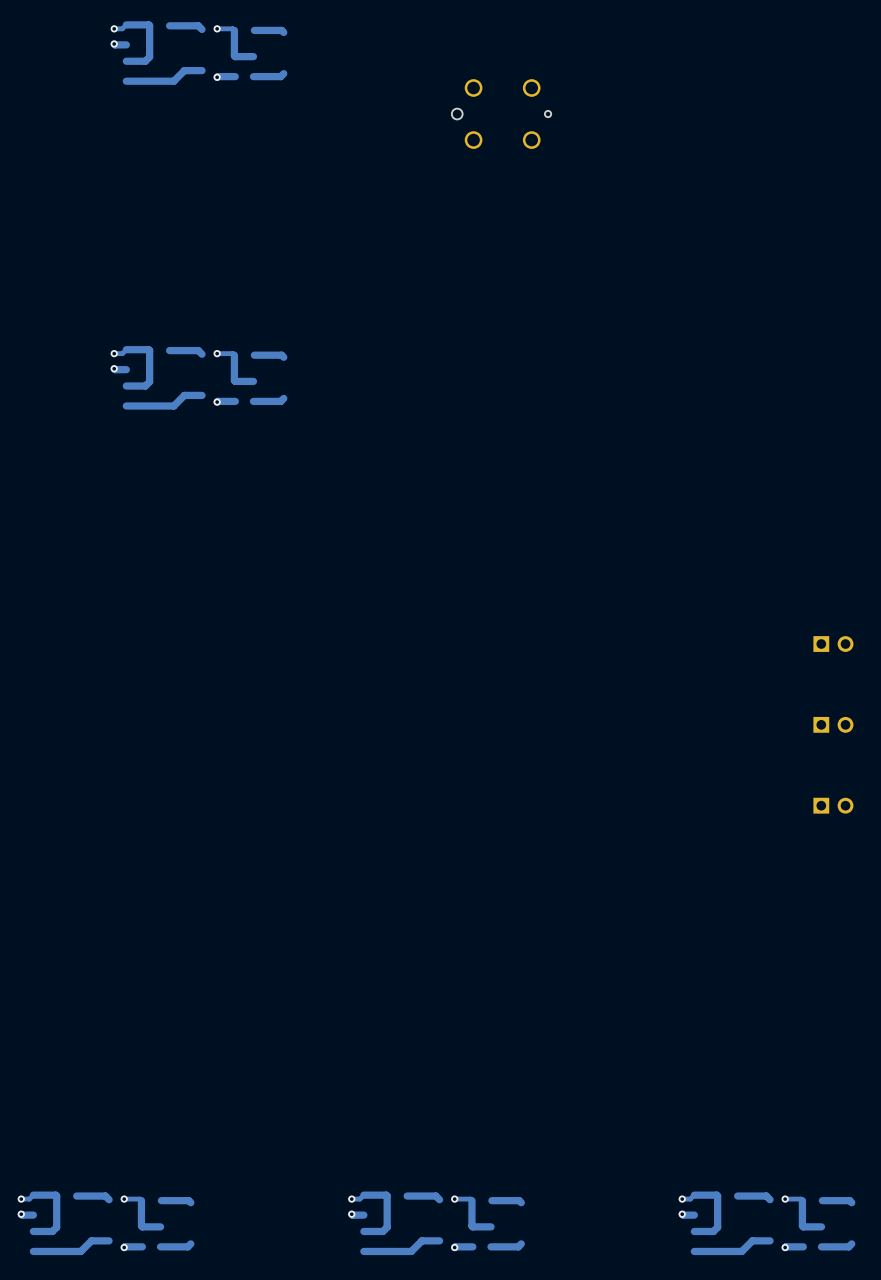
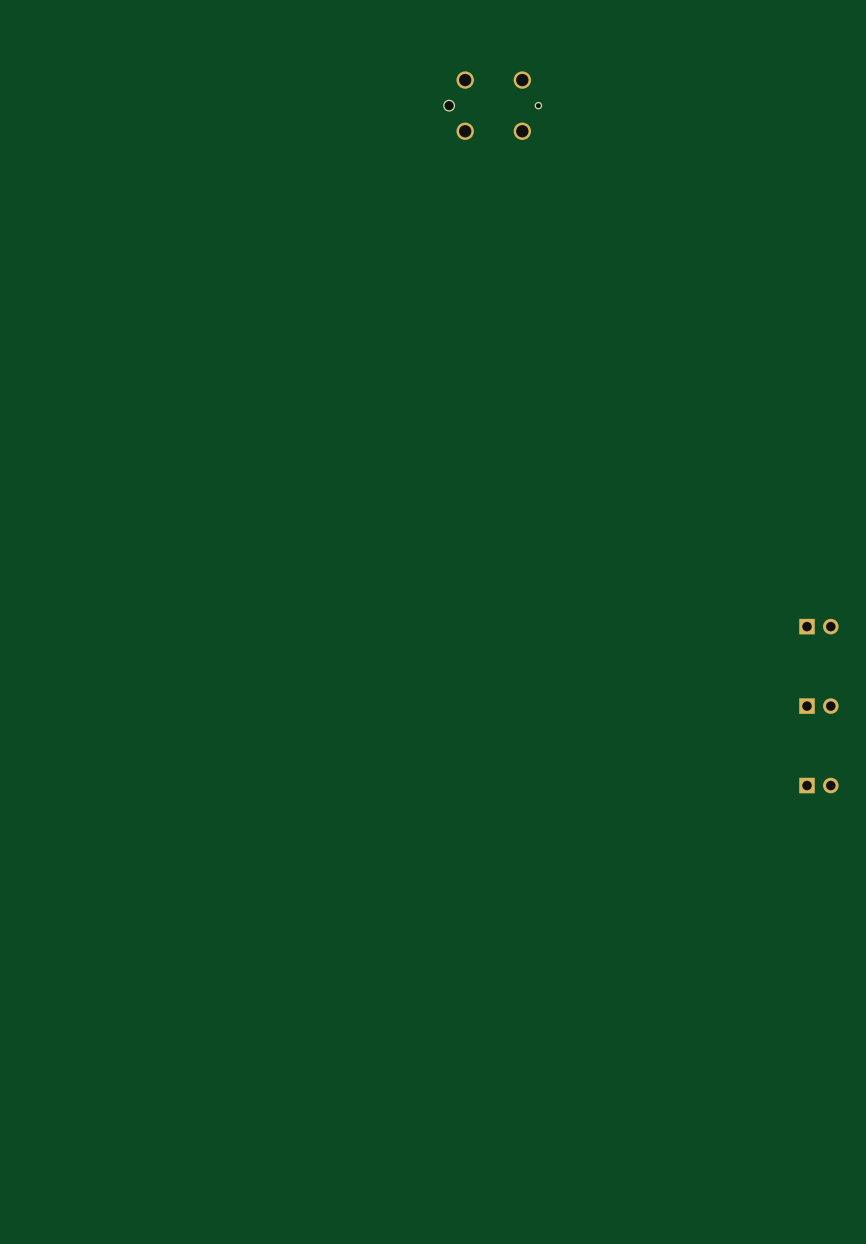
track: (169, 25) (198, 25) (202, 29) -> none
track: (114, 28) (122, 28) (126, 24) (149, 25) (149, 56) (145, 61) (126, 61) -> none
via: (114, 28) -> none
track: (217, 28) (234, 30) (235, 56) (253, 56) -> none
via: (217, 28) -> none
track: (254, 30) (281, 30) (283, 32) -> none
track: (114, 43) (126, 44) -> none
via: (114, 43) -> none
track: (202, 70) (184, 70) (173, 81) (126, 81) -> none
track: (283, 73) (280, 76) (253, 76) -> none
track: (235, 76) (217, 77) -> none
via: (217, 77) -> none
track: (169, 350) (198, 350) (202, 354) -> none
track: (114, 353) (122, 353) (126, 349) (149, 350) (149, 381) (145, 386) (126, 386) -> none
via: (114, 353) -> none
track: (217, 353) (234, 355) (235, 381) (253, 381) -> none
via: (217, 353) -> none
track: (254, 355) (281, 355) (283, 357) -> none
track: (114, 368) (126, 369) -> none
via: (114, 368) -> none
track: (202, 395) (184, 395) (173, 406) (126, 406) -> none
track: (283, 398) (280, 401) (253, 401) -> none
track: (235, 401) (217, 402) -> none
via: (217, 402) -> none
track: (76, 1196) (105, 1196) (109, 1199) -> none
track: (407, 1196) (435, 1196) (439, 1199) -> none
track: (737, 1196) (766, 1196) (770, 1199) -> none
track: (21, 1199) (29, 1199) (33, 1195) (56, 1196) (56, 1227) (52, 1231) (33, 1231) -> none
via: (21, 1199) -> none
track: (124, 1199) (141, 1200) (142, 1226) (160, 1226) -> none
via: (124, 1199) -> none
track: (351, 1199) (359, 1199) (363, 1195) (387, 1196) (387, 1227) (382, 1231) (363, 1231) -> none
via: (351, 1199) -> none
track: (454, 1199) (471, 1200) (472, 1226) (491, 1226) -> none
via: (454, 1199) -> none
track: (682, 1199) (690, 1199) (694, 1195) (717, 1196) (717, 1227) (713, 1231) (694, 1231) -> none
via: (682, 1199) -> none
track: (785, 1199) (802, 1200) (803, 1226) (821, 1226) -> none
via: (785, 1199) -> none
track: (161, 1200) (188, 1200) (190, 1202) -> none
track: (491, 1200) (519, 1200) (521, 1202) -> none
track: (822, 1200) (849, 1200) (851, 1202) -> none
track: (21, 1214) (33, 1215) -> none
via: (21, 1214) -> none
track: (351, 1214) (363, 1215) -> none
via: (351, 1214) -> none
track: (682, 1214) (694, 1215) -> none
via: (682, 1214) -> none
track: (109, 1240) (91, 1240) (80, 1251) (33, 1251) -> none
track: (439, 1240) (421, 1240) (411, 1251) (363, 1251) -> none
track: (770, 1240) (752, 1240) (741, 1251) (694, 1251) -> none
track: (190, 1243) (187, 1246) (160, 1246) -> none
track: (521, 1243) (518, 1246) (491, 1246) -> none
track: (851, 1243) (848, 1246) (821, 1246) -> none
track: (142, 1246) (124, 1247) -> none
track: (472, 1246) (454, 1247) -> none
track: (803, 1246) (785, 1247) -> none
via: (124, 1247) -> none
via: (454, 1247) -> none
via: (785, 1247) -> none

